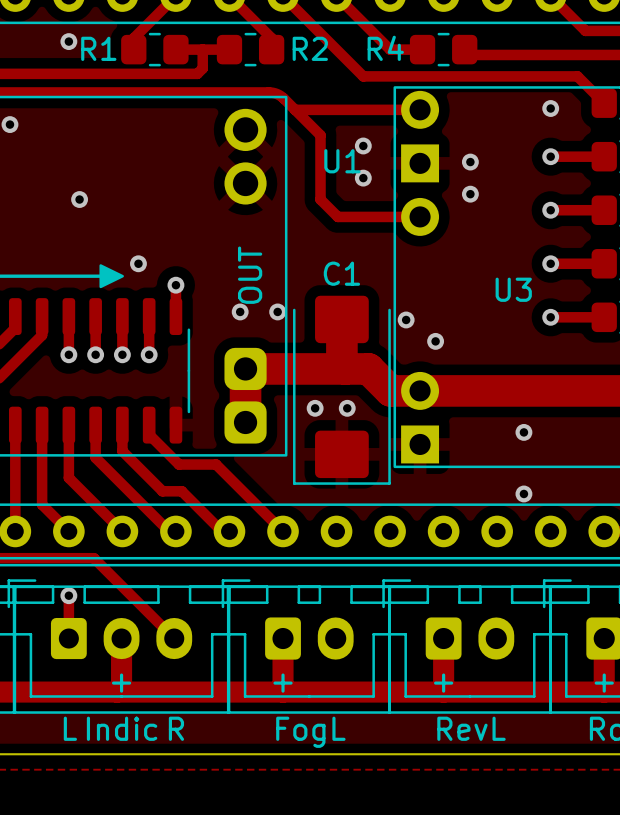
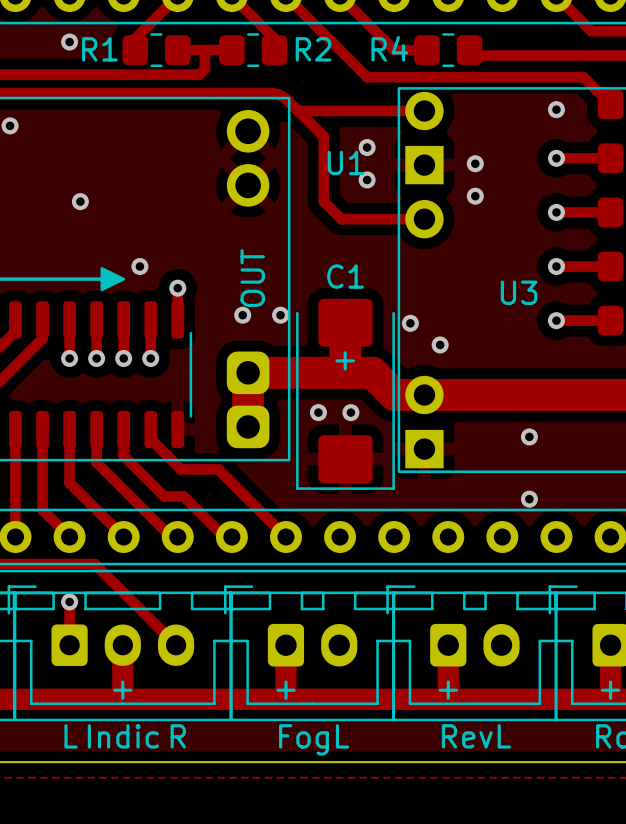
text: none -> + (345, 360)

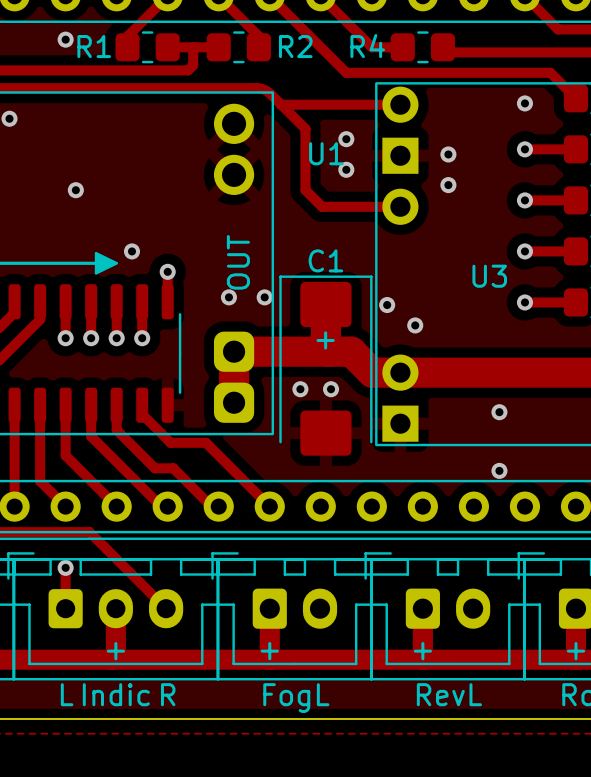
C1 rotation: 0° (345, 394) -> 180° (325, 365)

